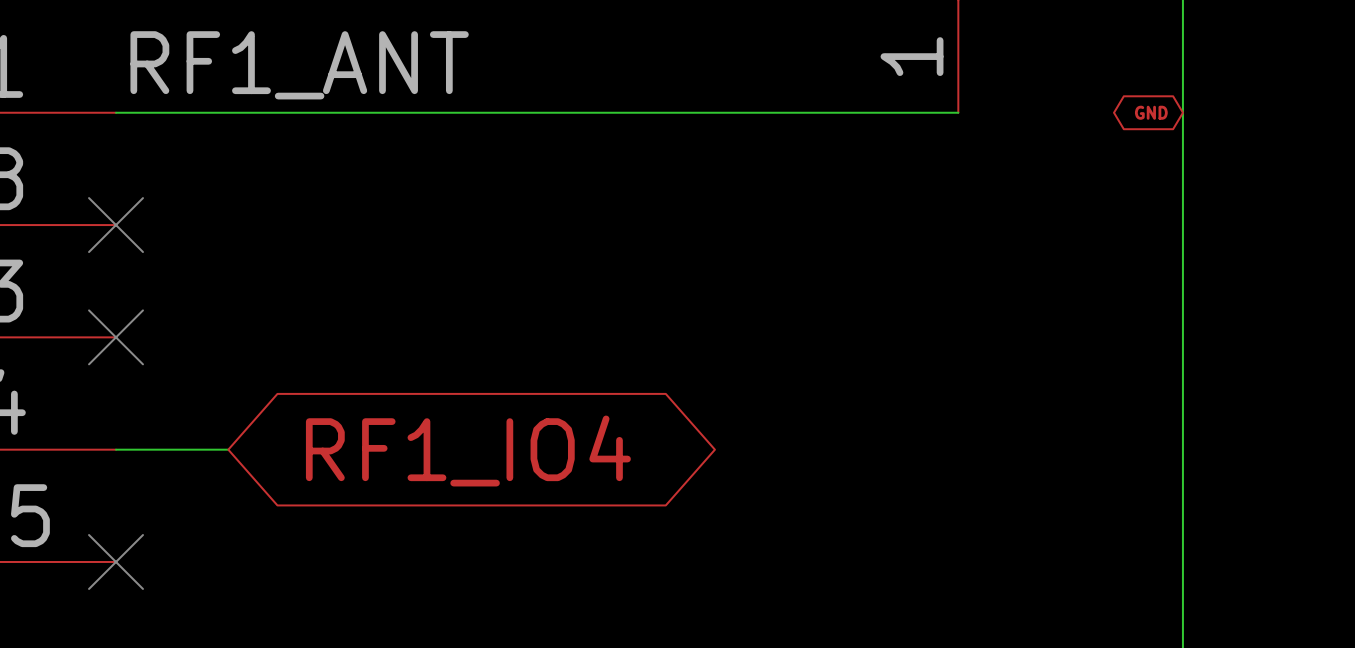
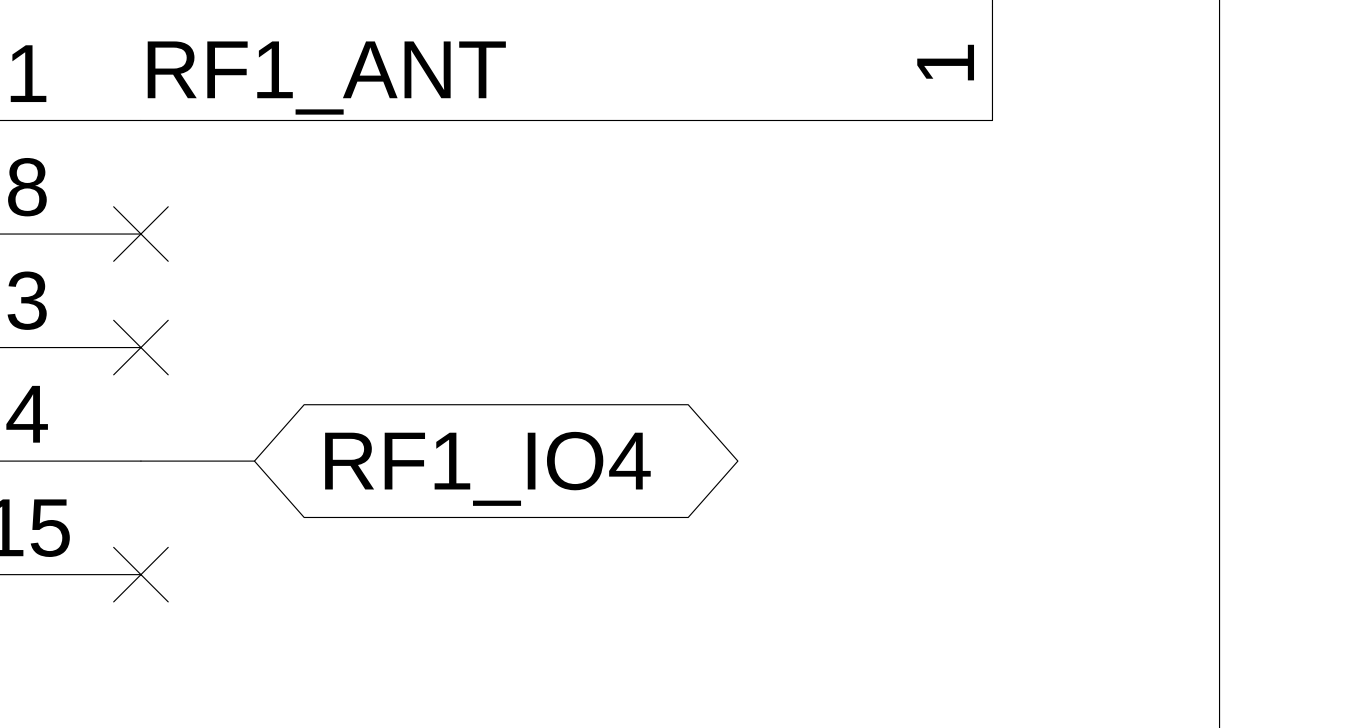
global label: GND (1151, 112) -> none

